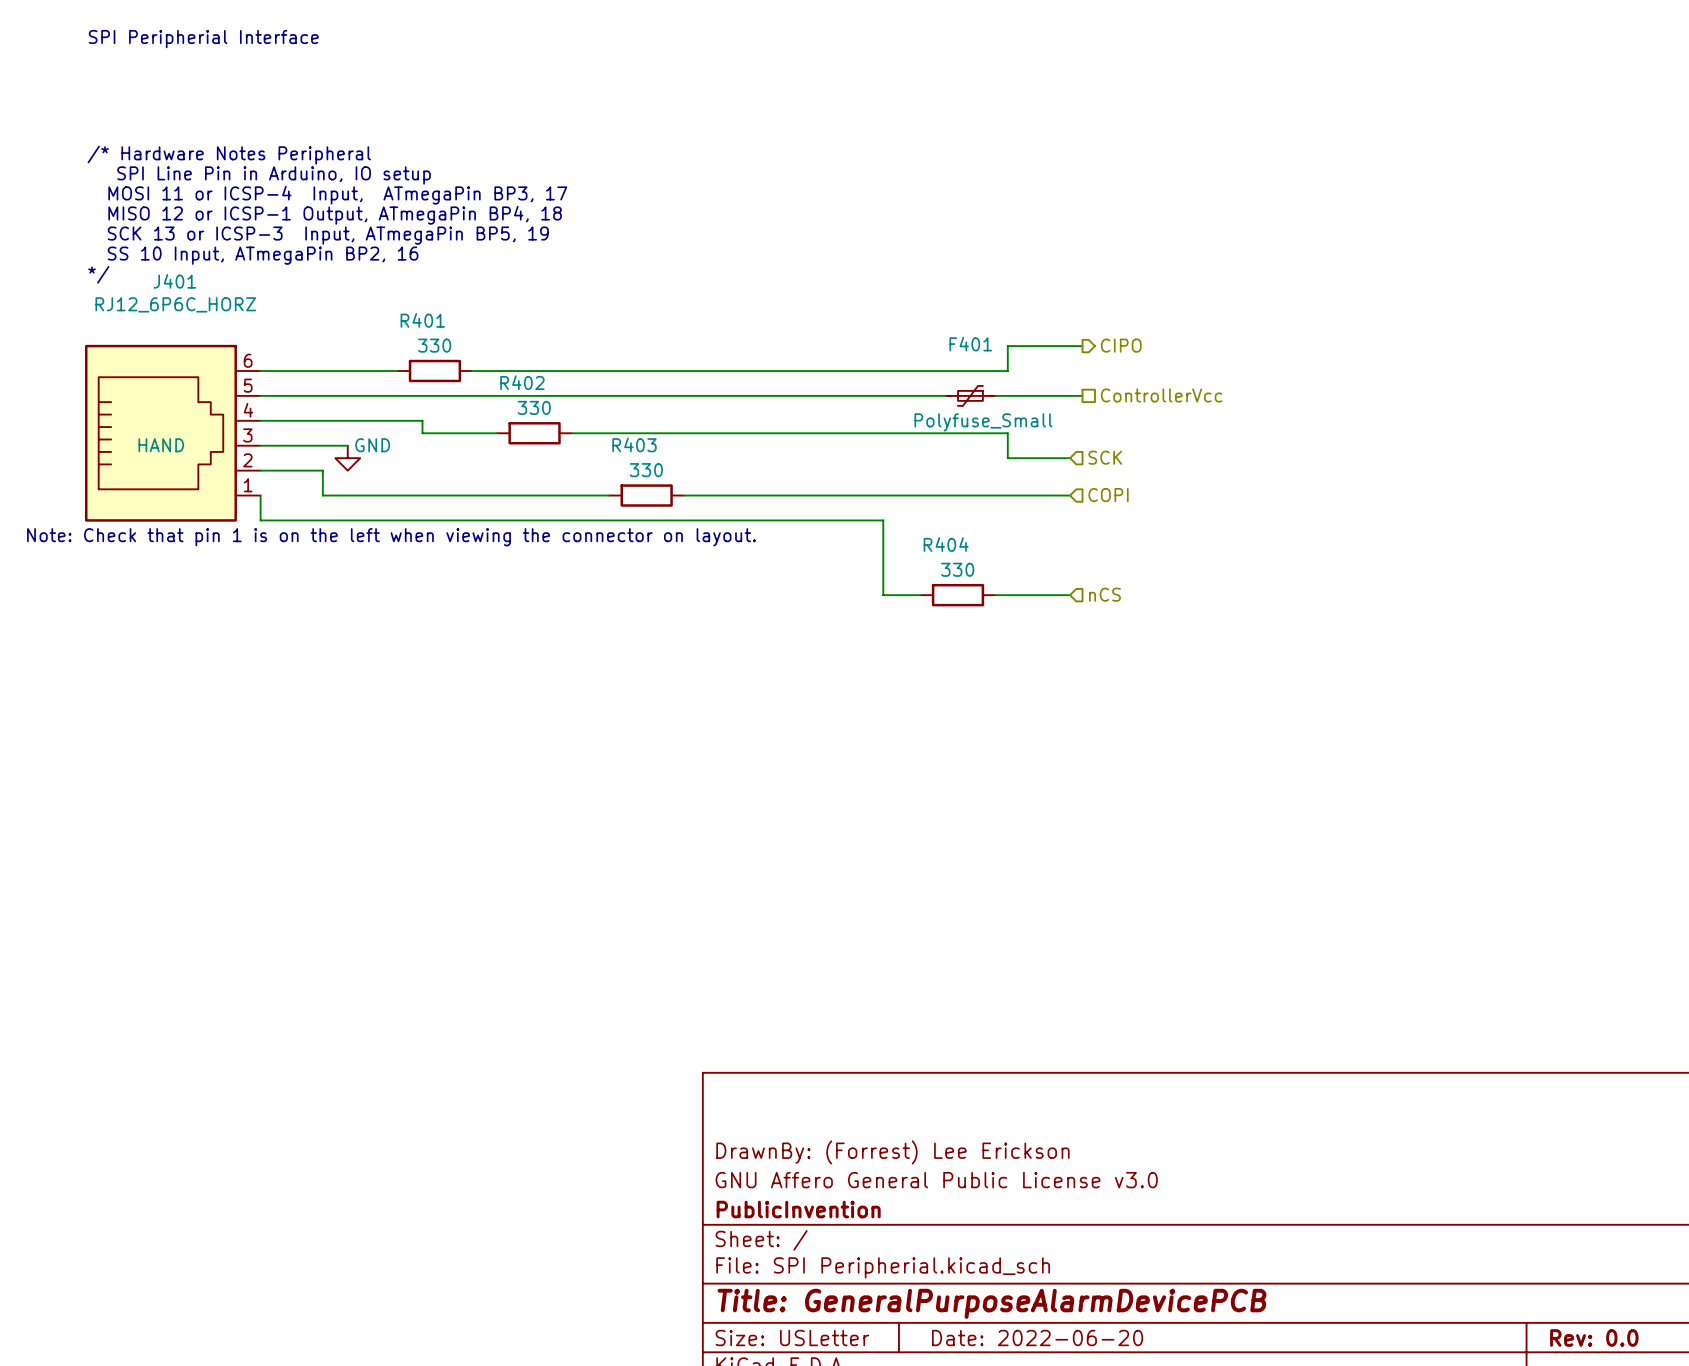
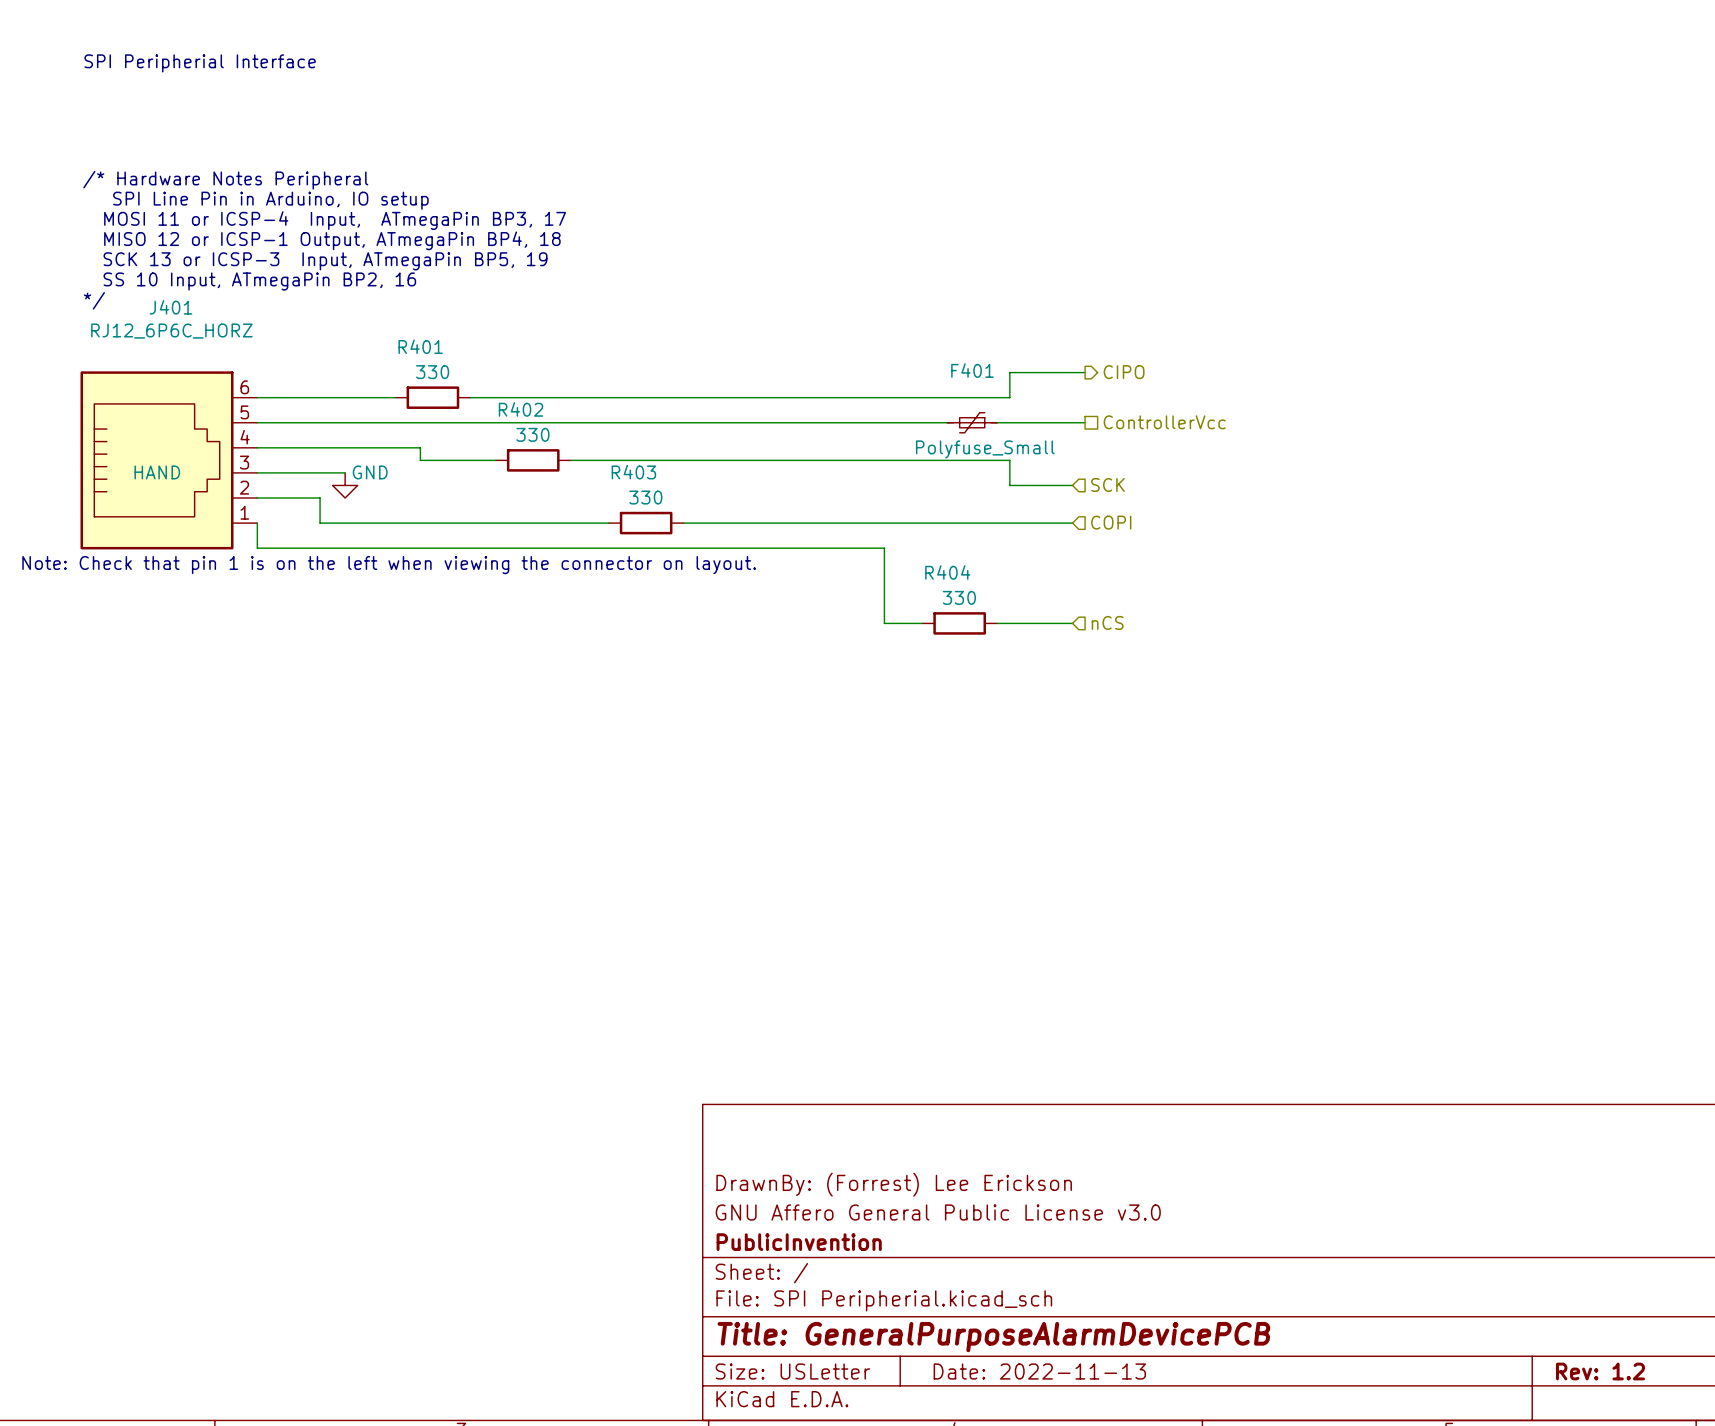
title block: Date: 2022-06-20 (1037, 1338) -> Date: 2022-11-13 (1039, 1371)
title block: Rev: 0.0 (1594, 1338) -> Rev: 1.2 (1600, 1371)

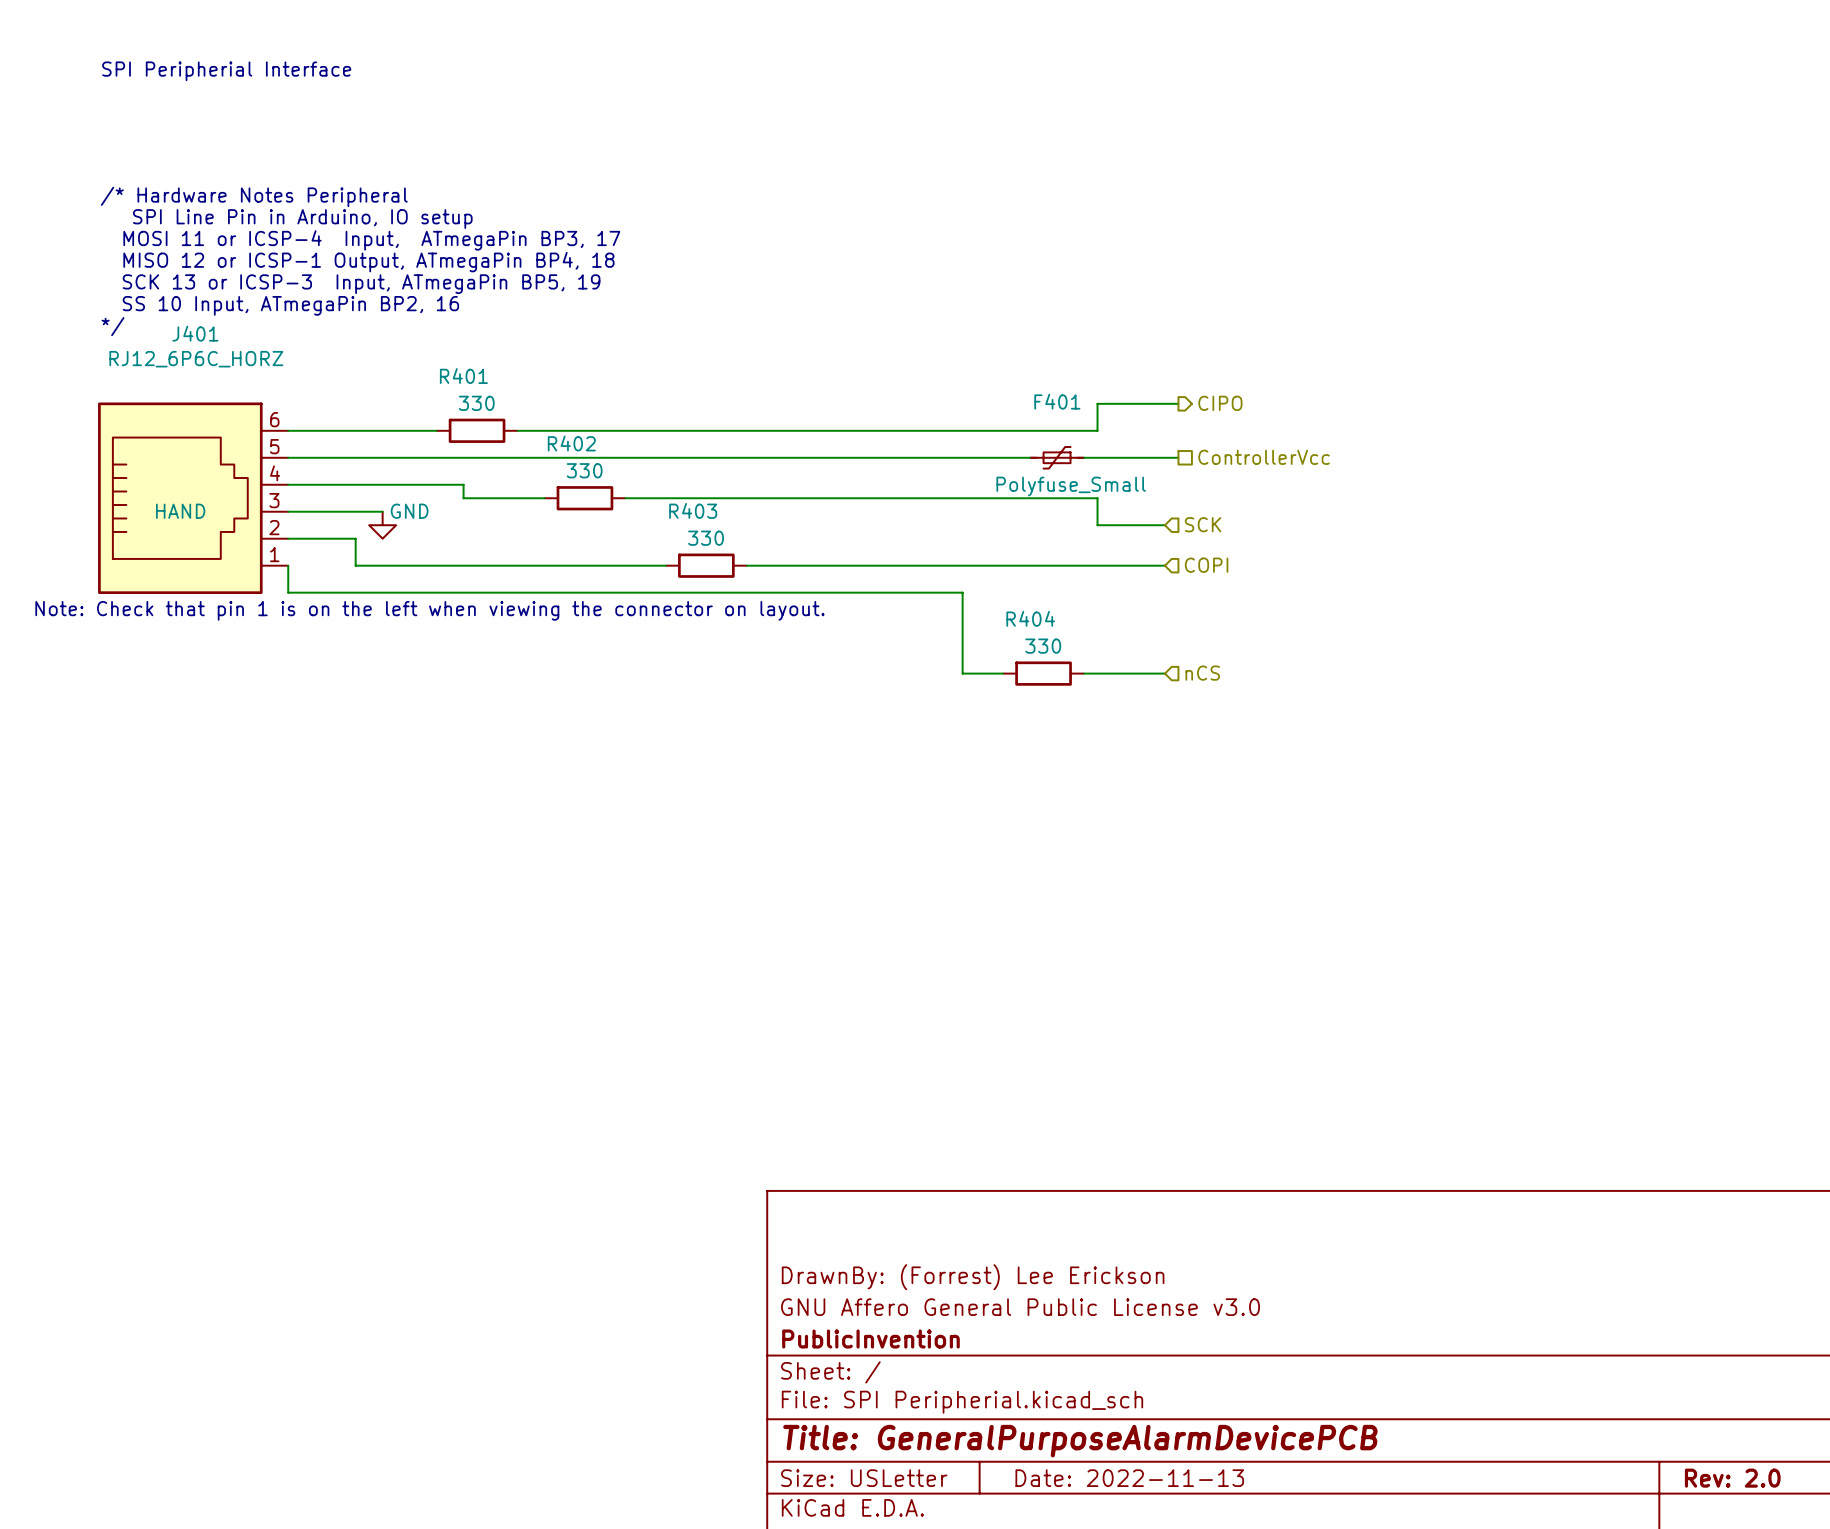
title block: Rev: 1.2 (1600, 1371) -> Rev: 2.0 (1732, 1478)

